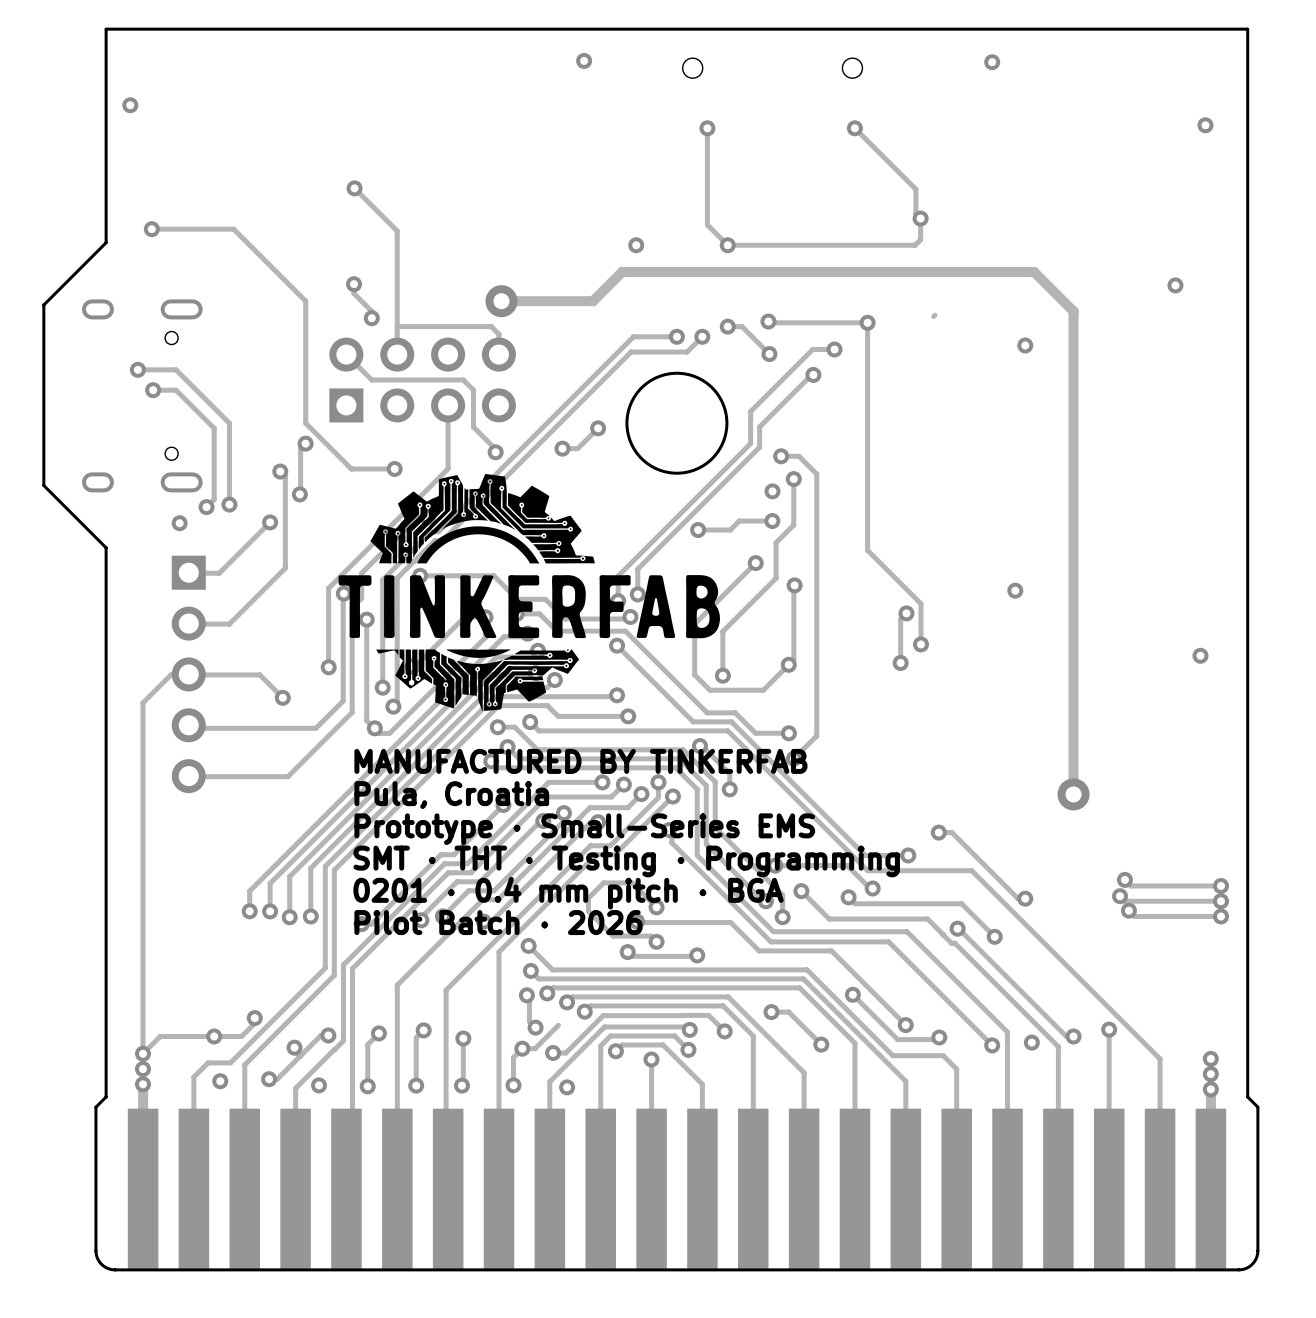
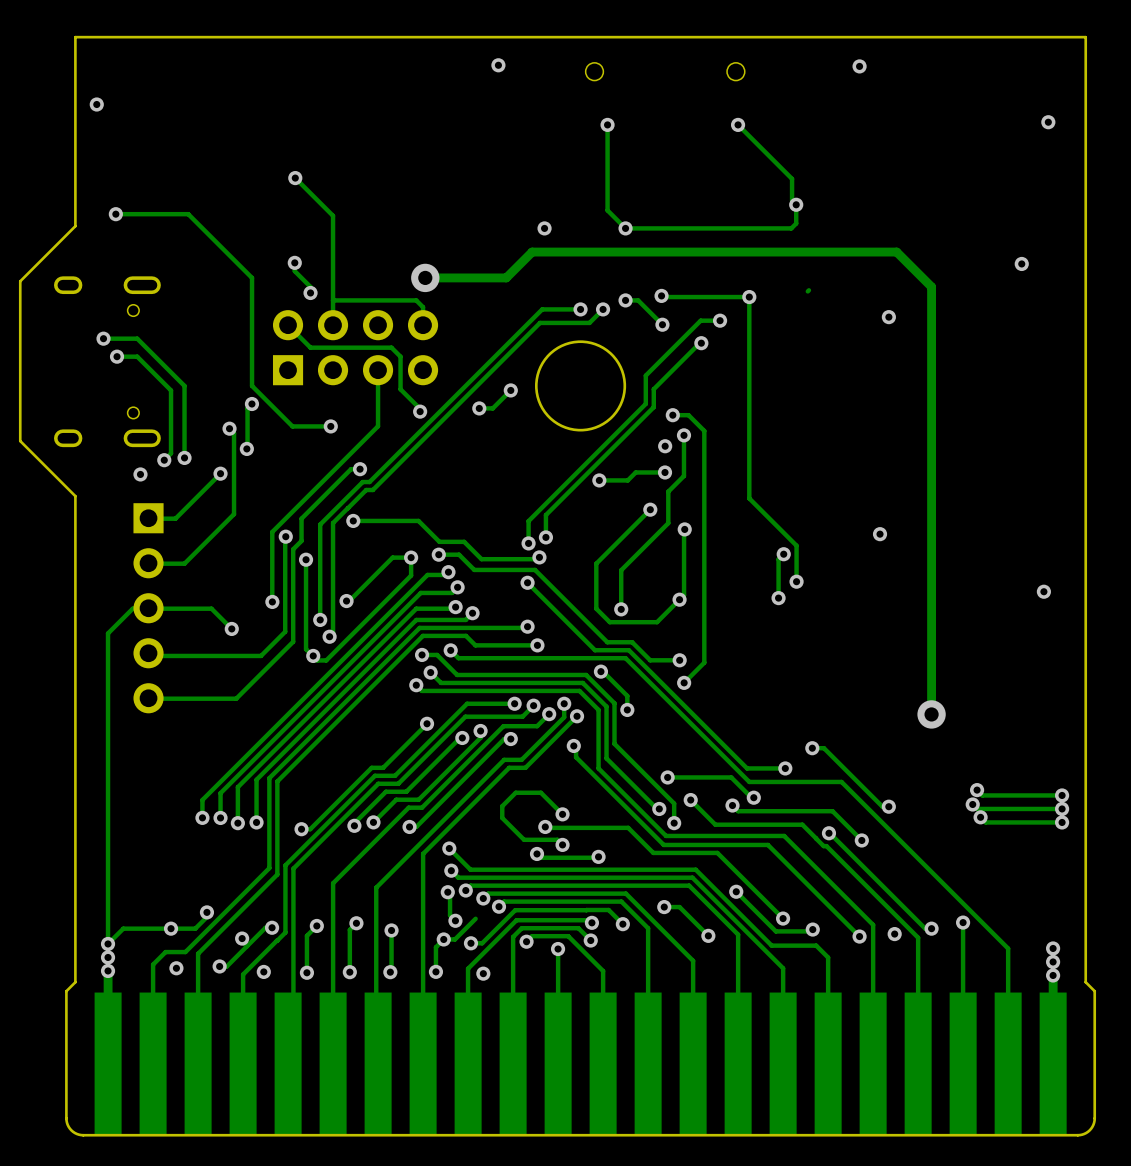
drawing: [338, 473, 720, 711] -> none
text: MANUFACTURED BY TINKERFAB (580, 761) -> none
text: Pula, Croatia (451, 795) -> none
text: Prototype · Small-Series EMS (584, 829) -> none
text: SMT · THT · Testing · Programming (626, 861) -> none
text: 0201 · 0.4 mm pitch · BGA (568, 893) -> none
text: Pilot Batch · 2026 (498, 922) -> none

